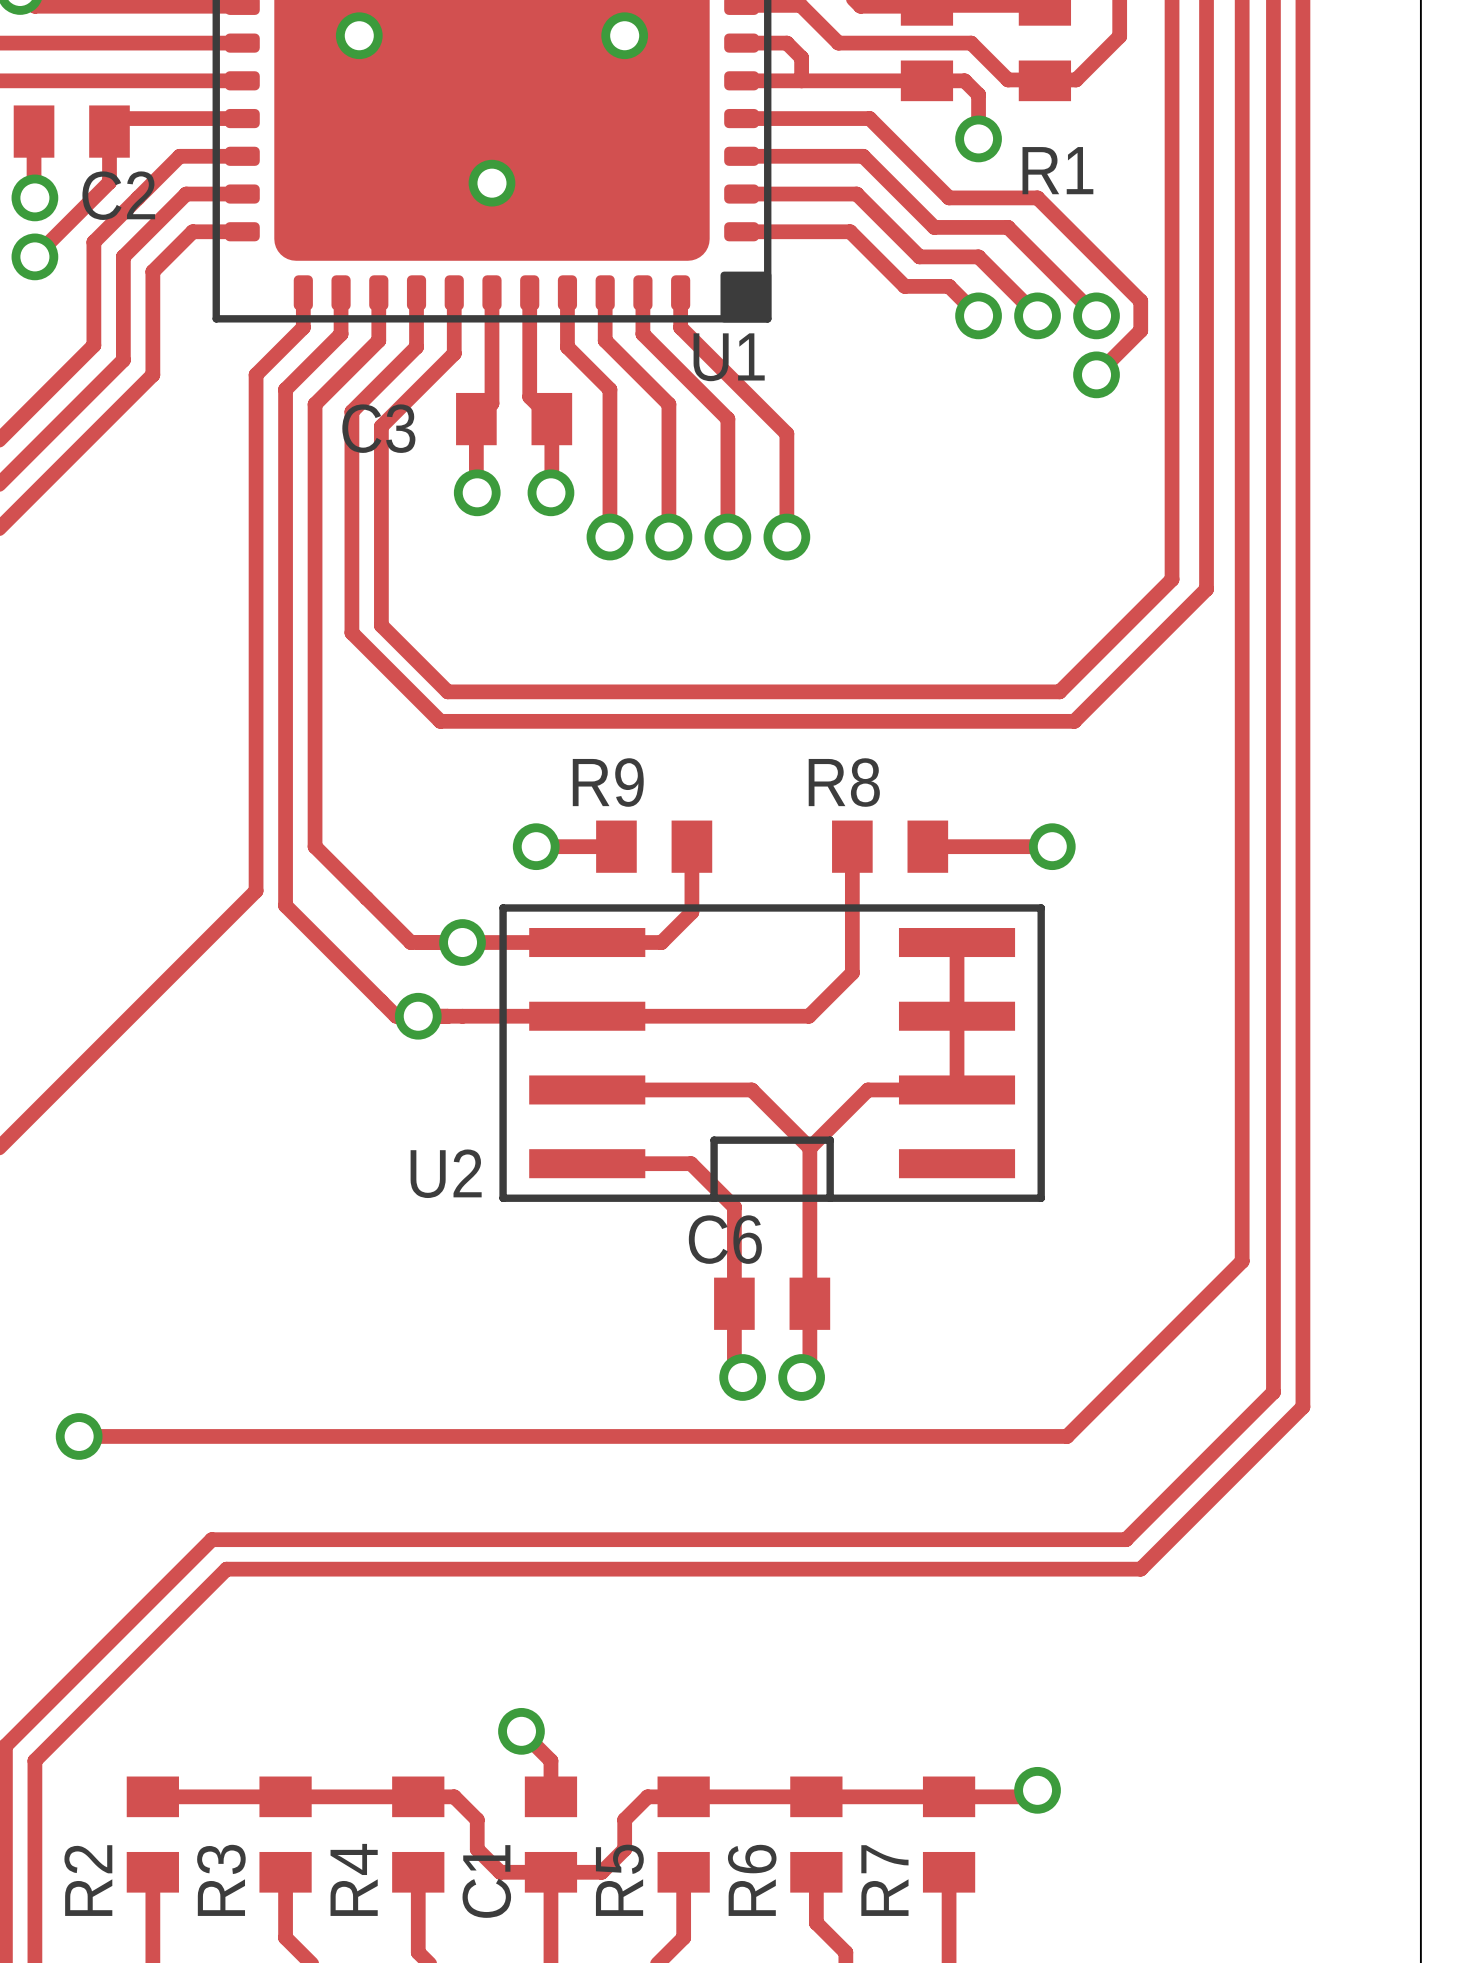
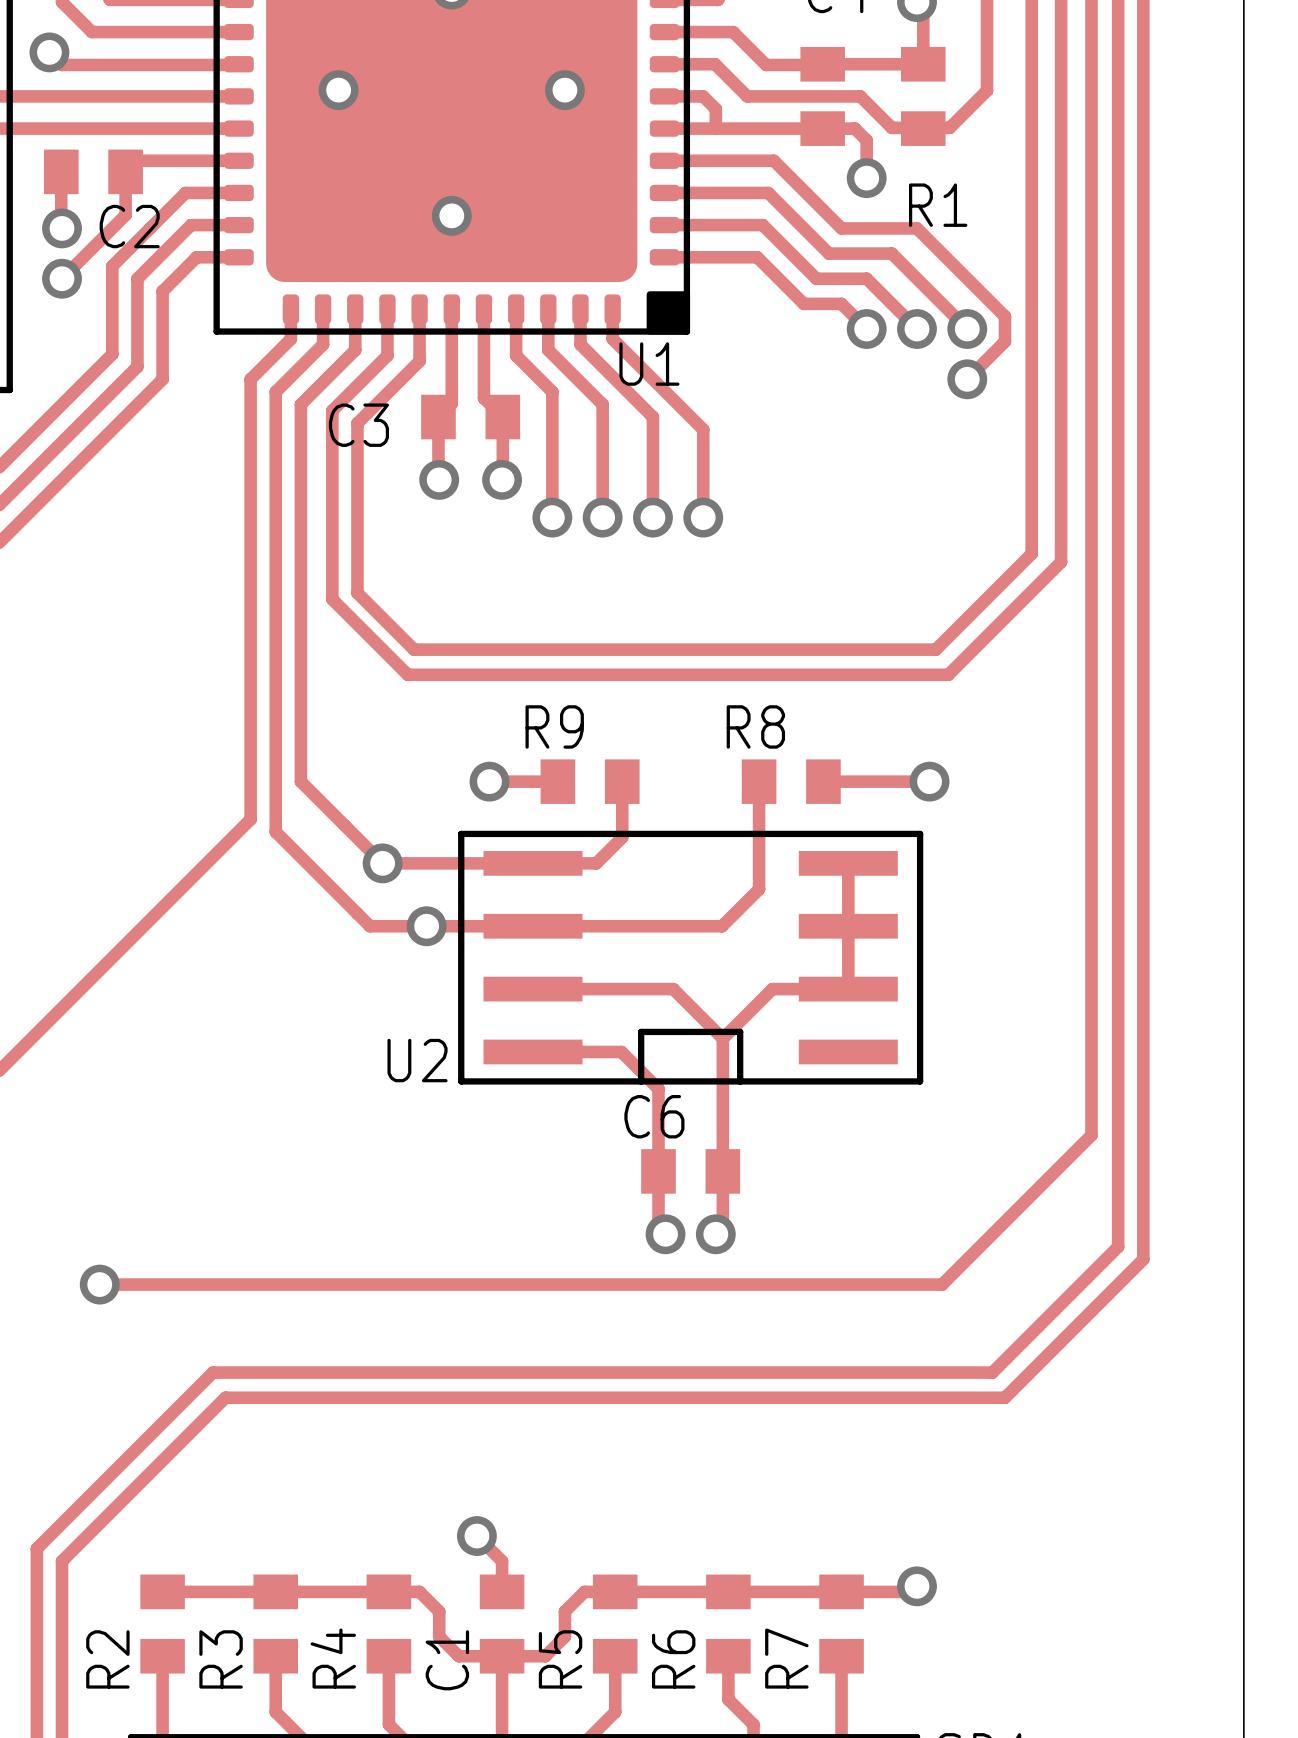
via: none -> (382, 863)
via: (462, 942) -> none
via position: (418, 1016) -> (426, 926)

